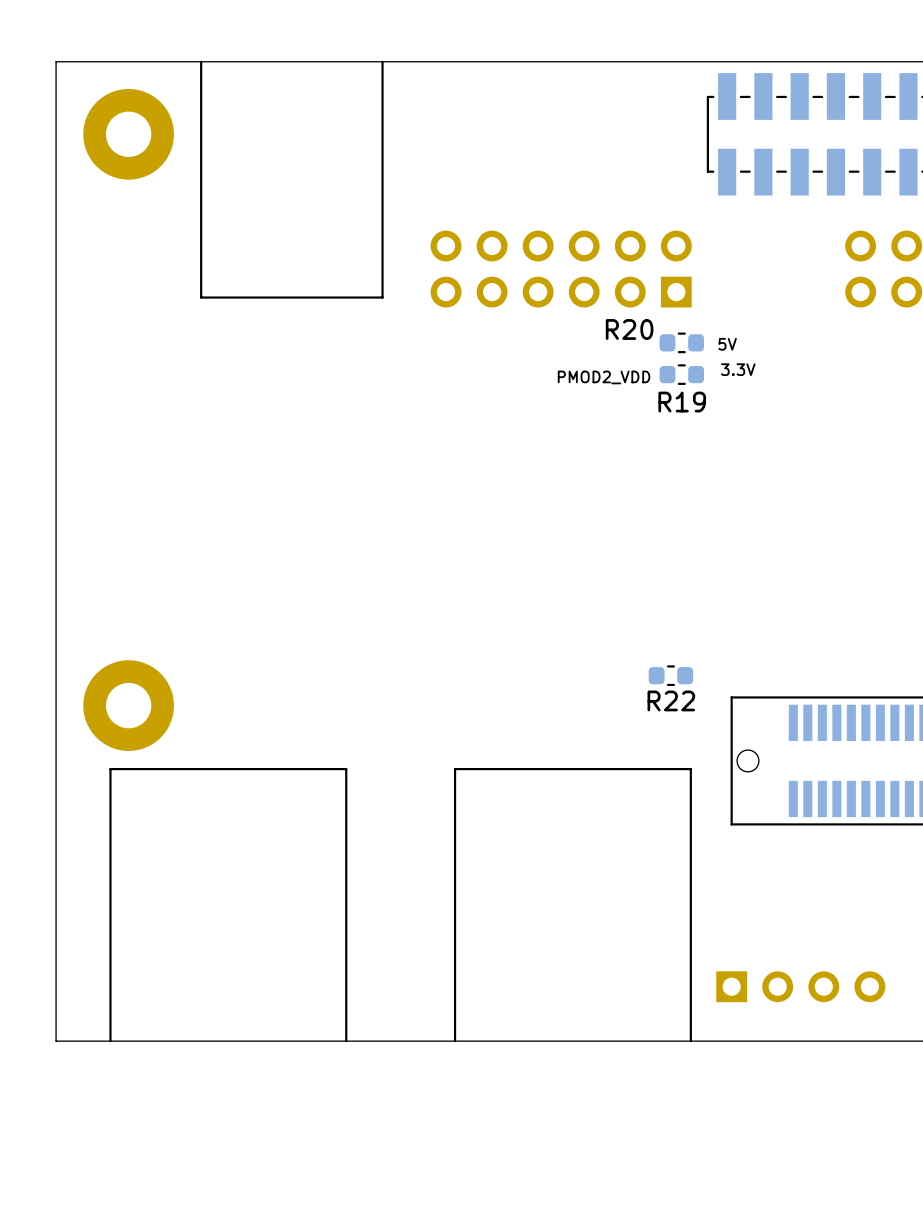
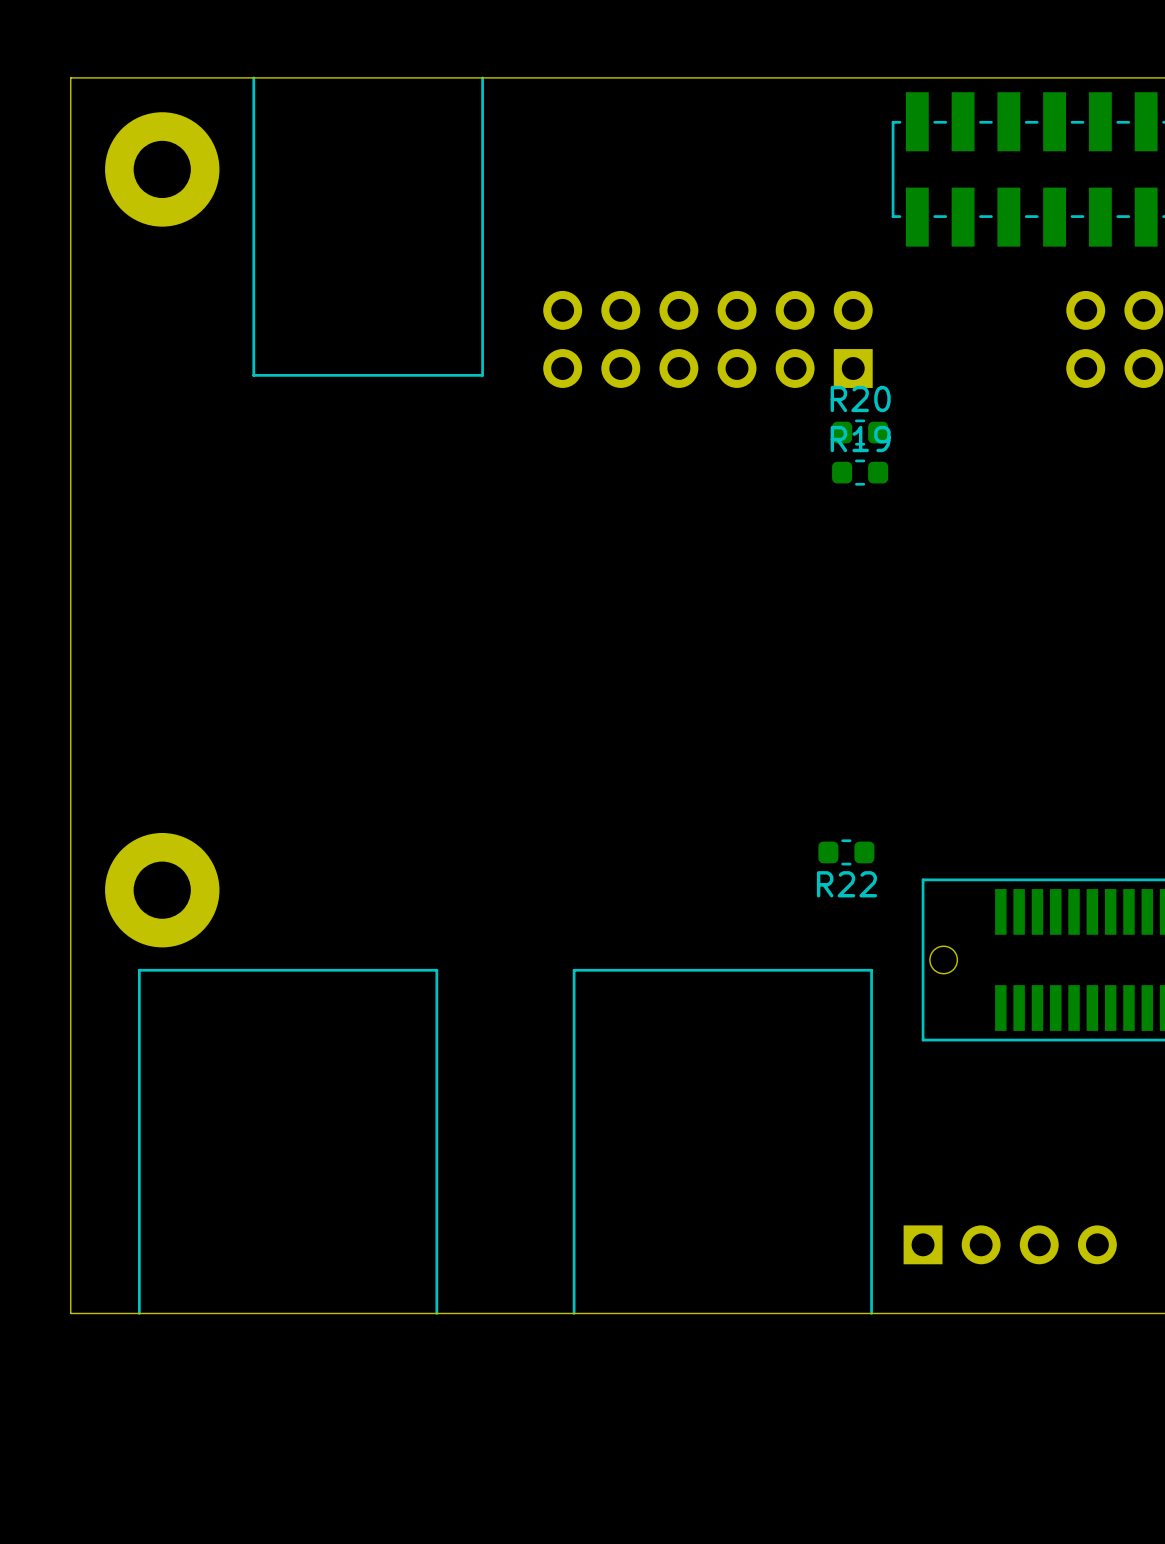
R20 name position: R20 (629, 329) -> R20 (860, 398)
text: 5V (727, 344) -> none
text: 3.3V (738, 369) -> none
text: PMOD2_VDD (604, 377) -> none
R19 name position: R19 (682, 402) -> R19 (860, 439)

